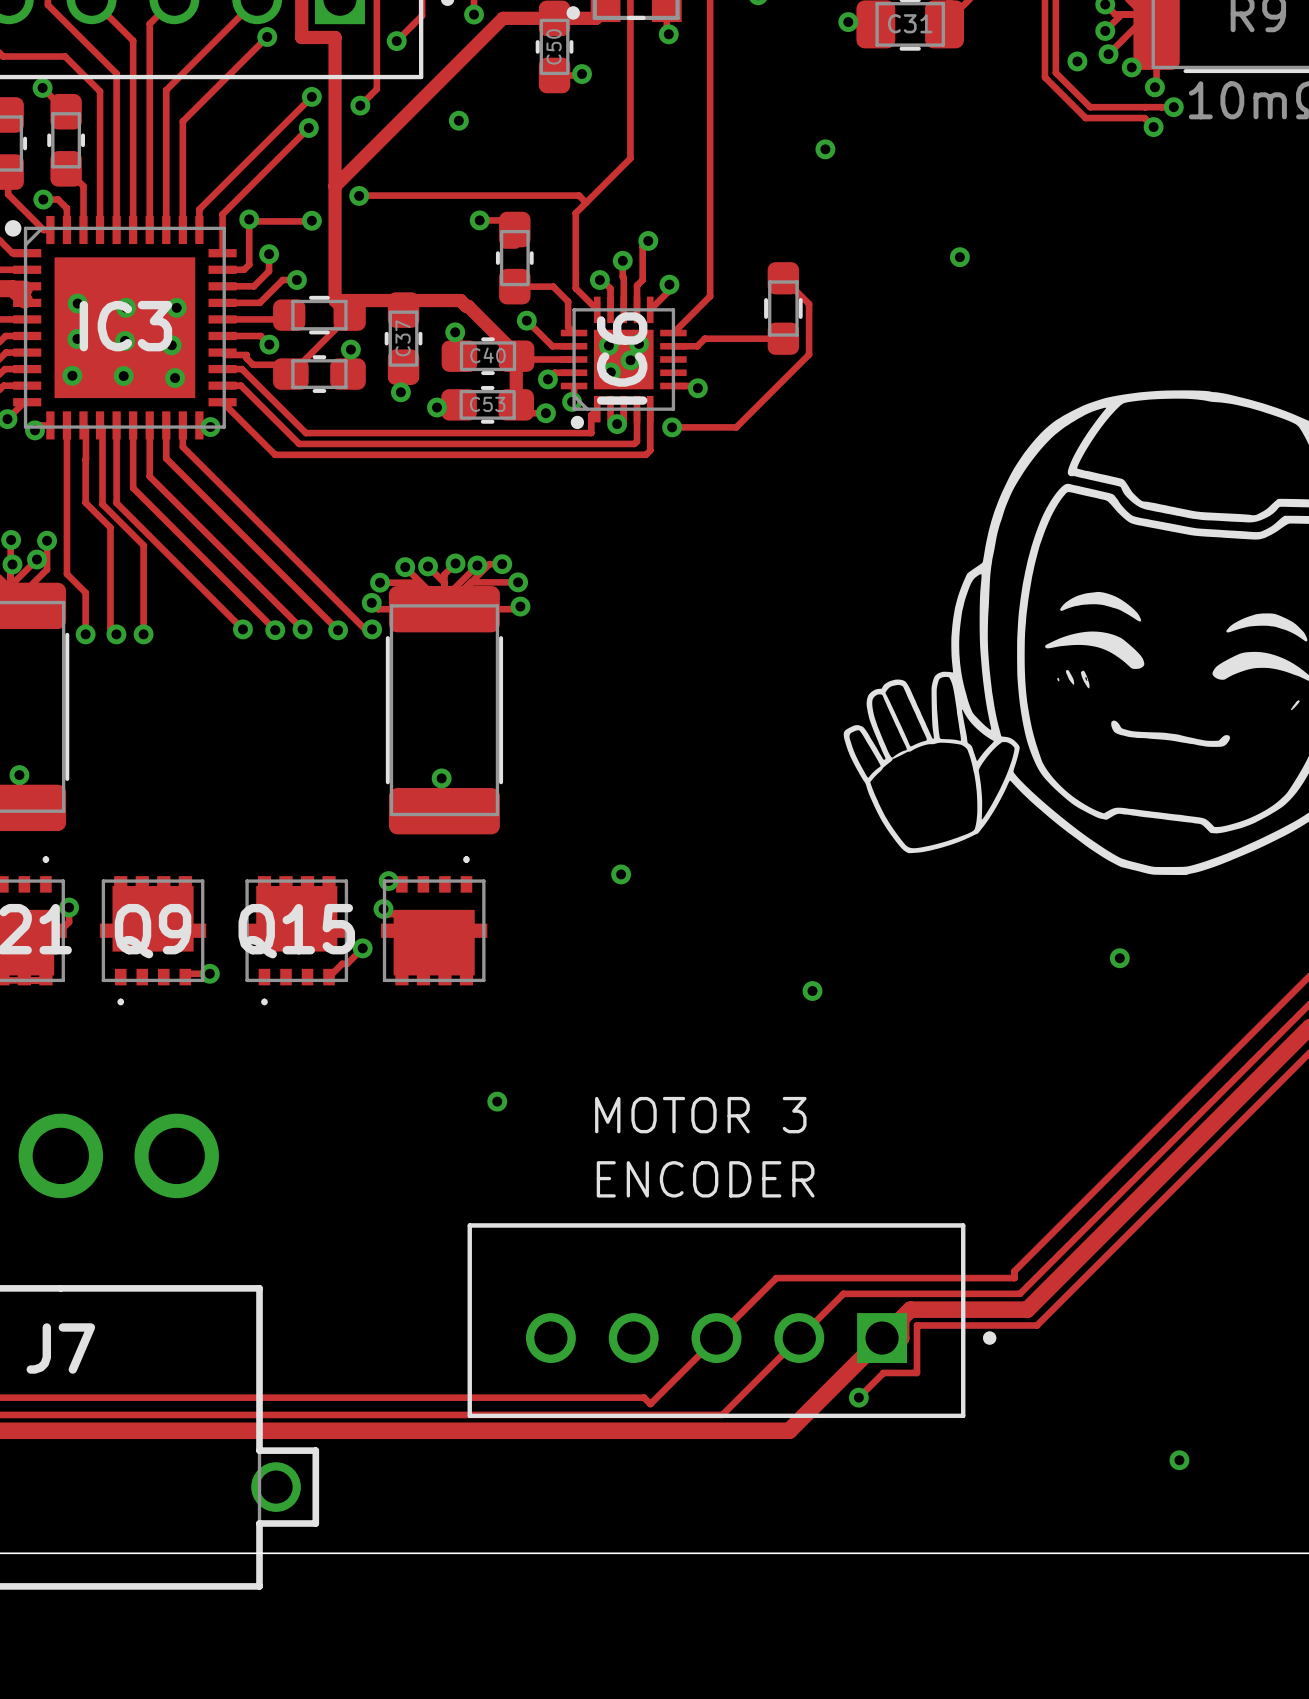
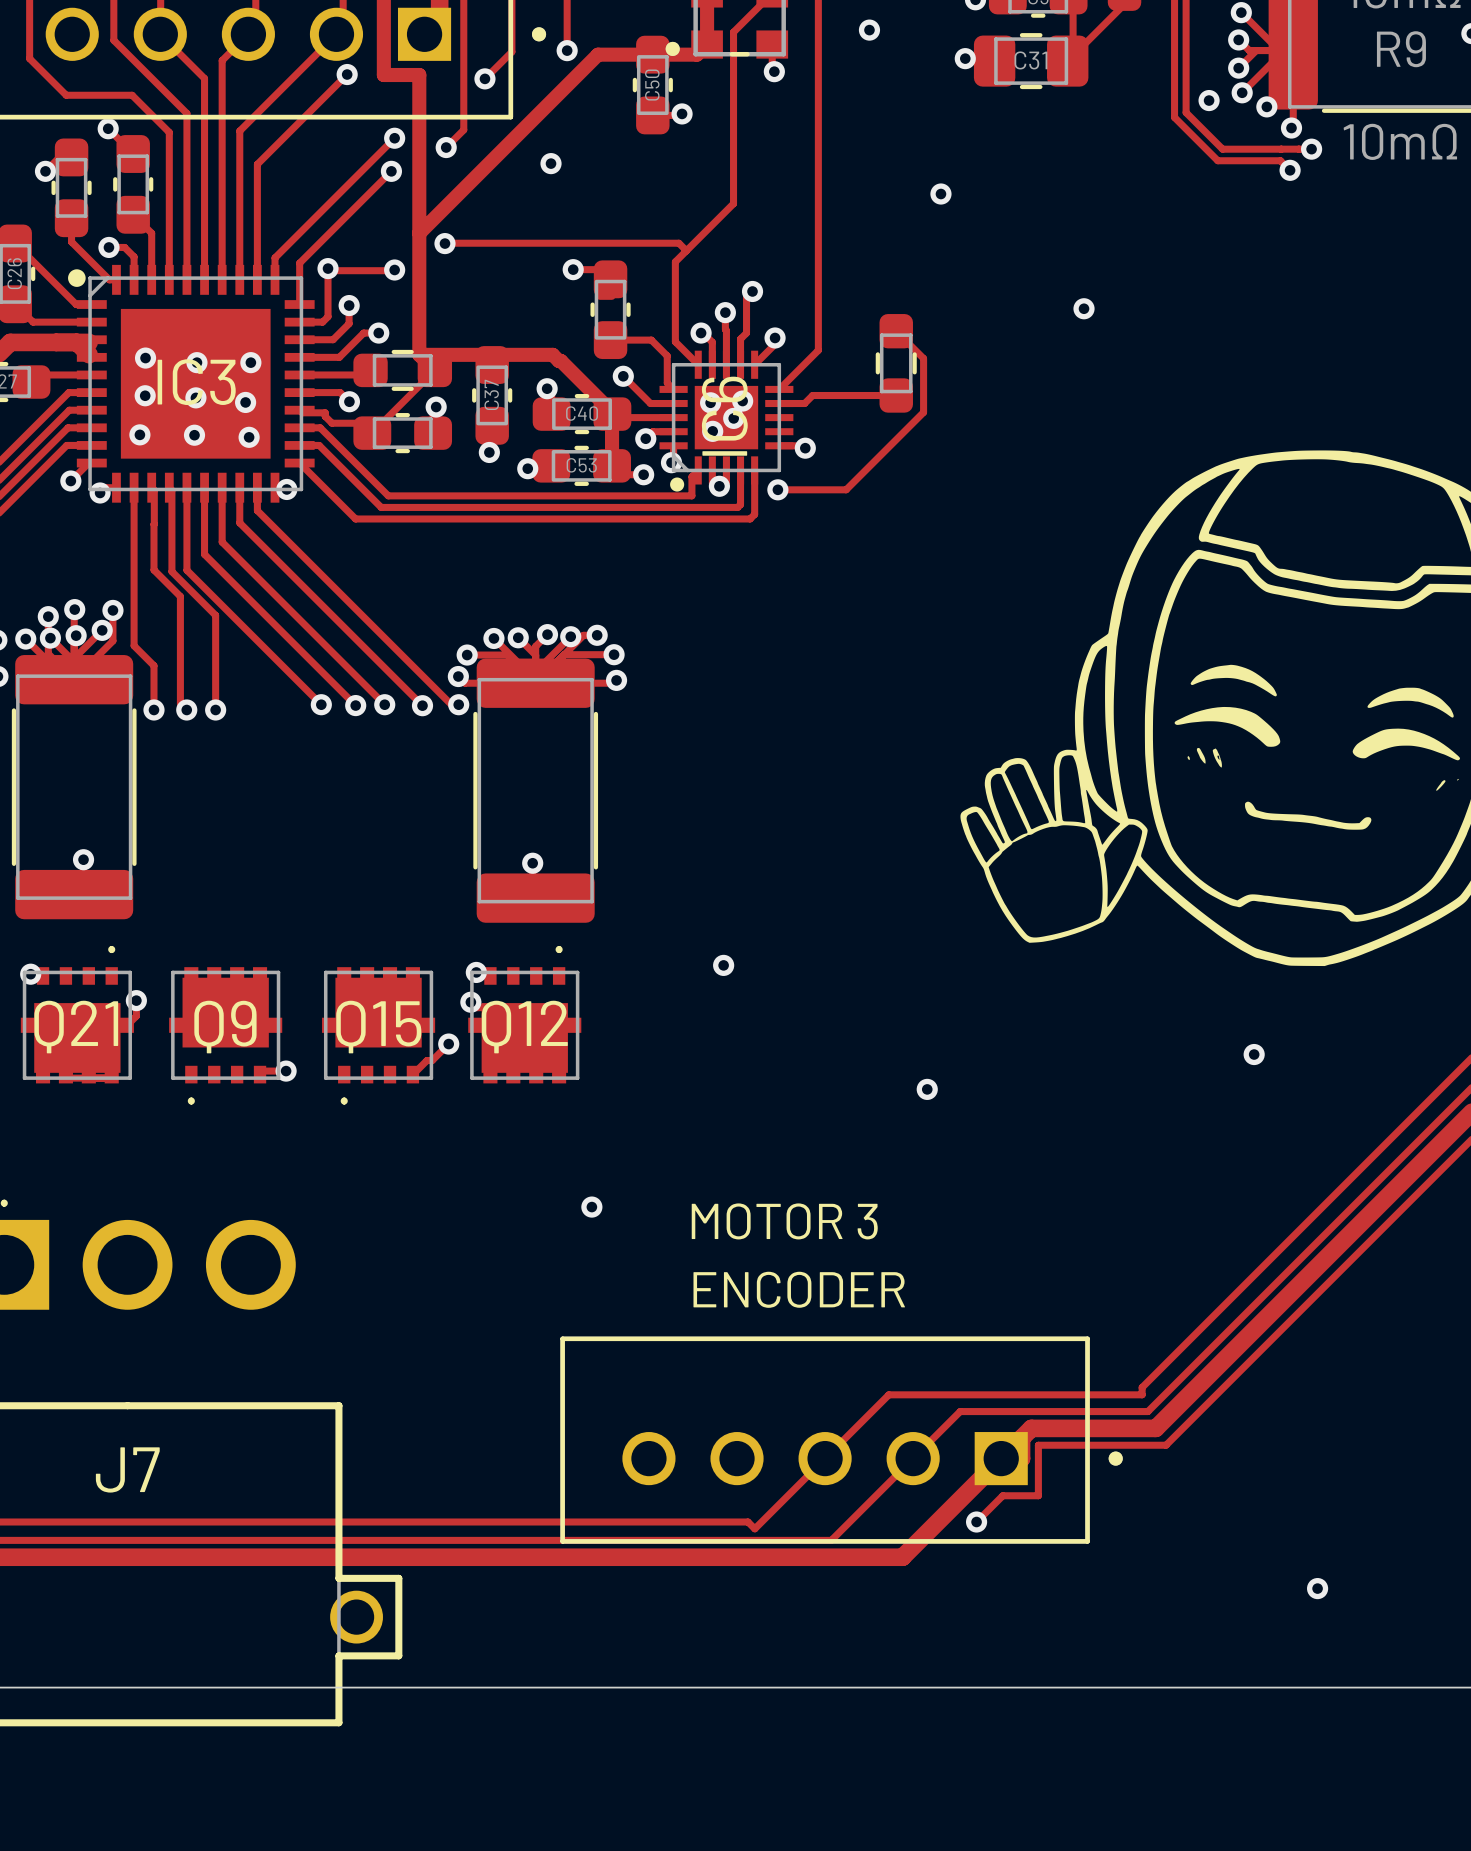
Q12 name: none -> Q12 (524, 1027)

